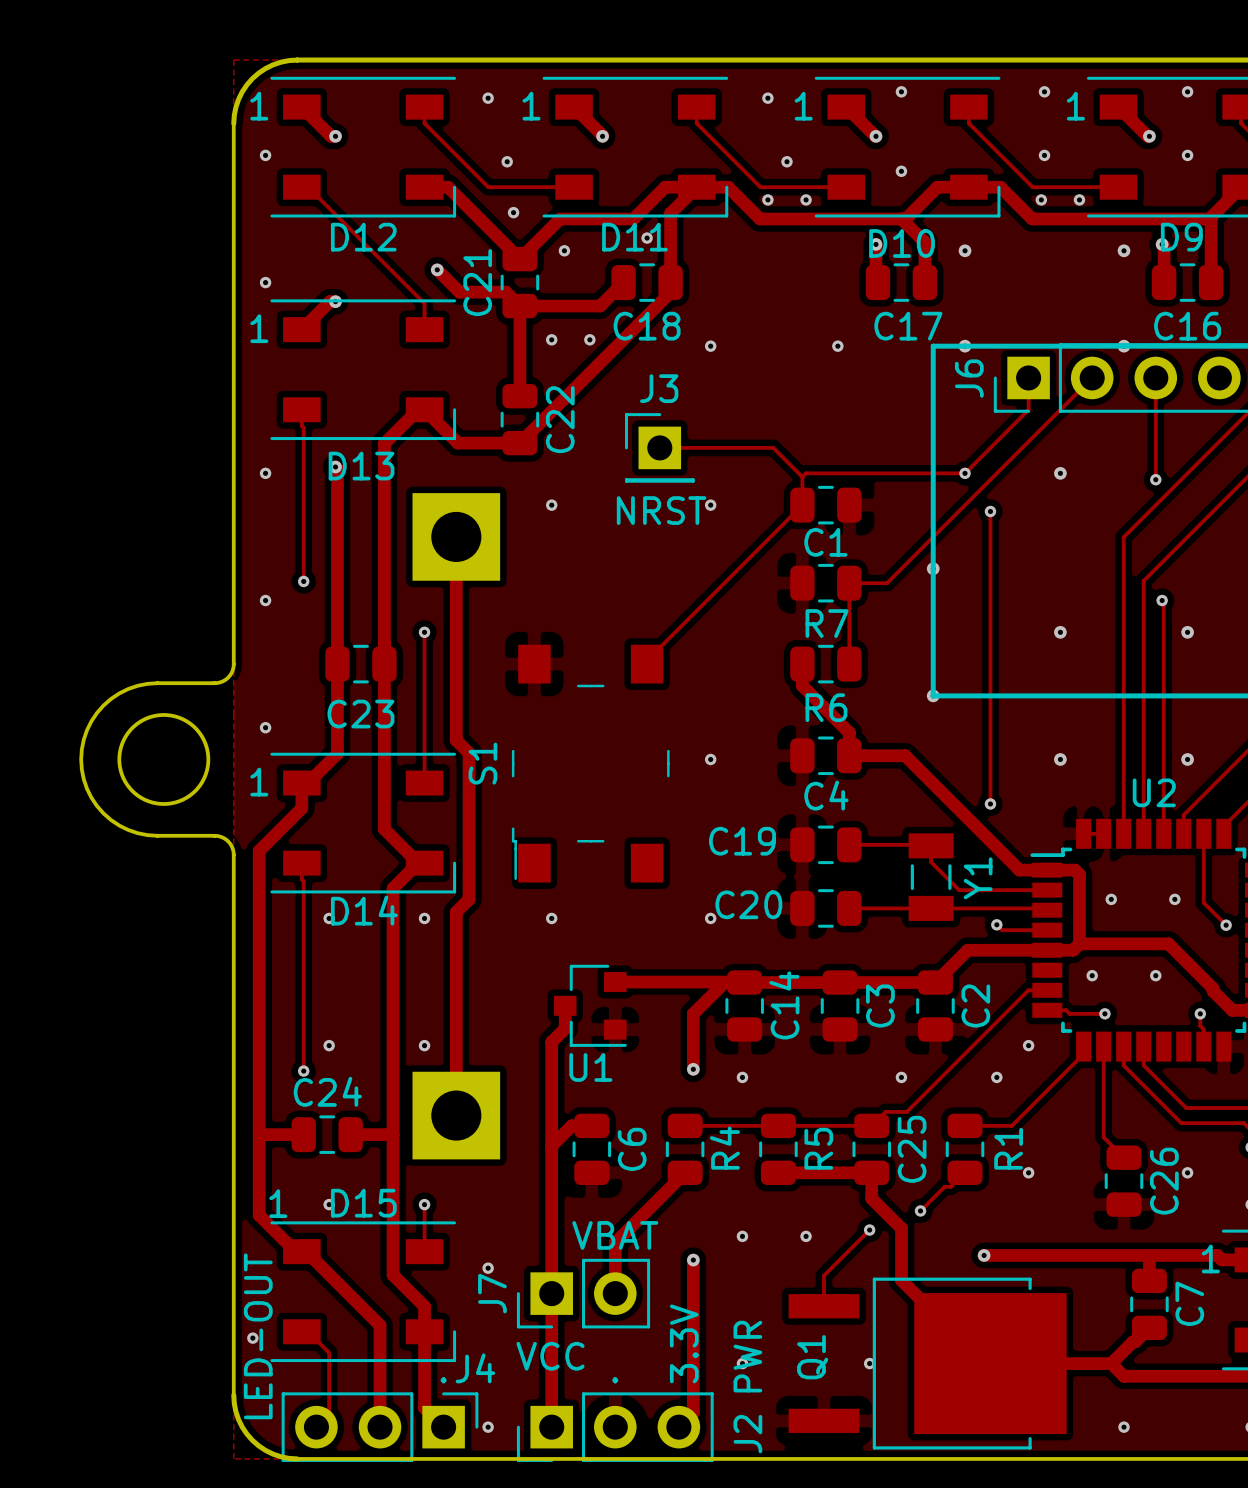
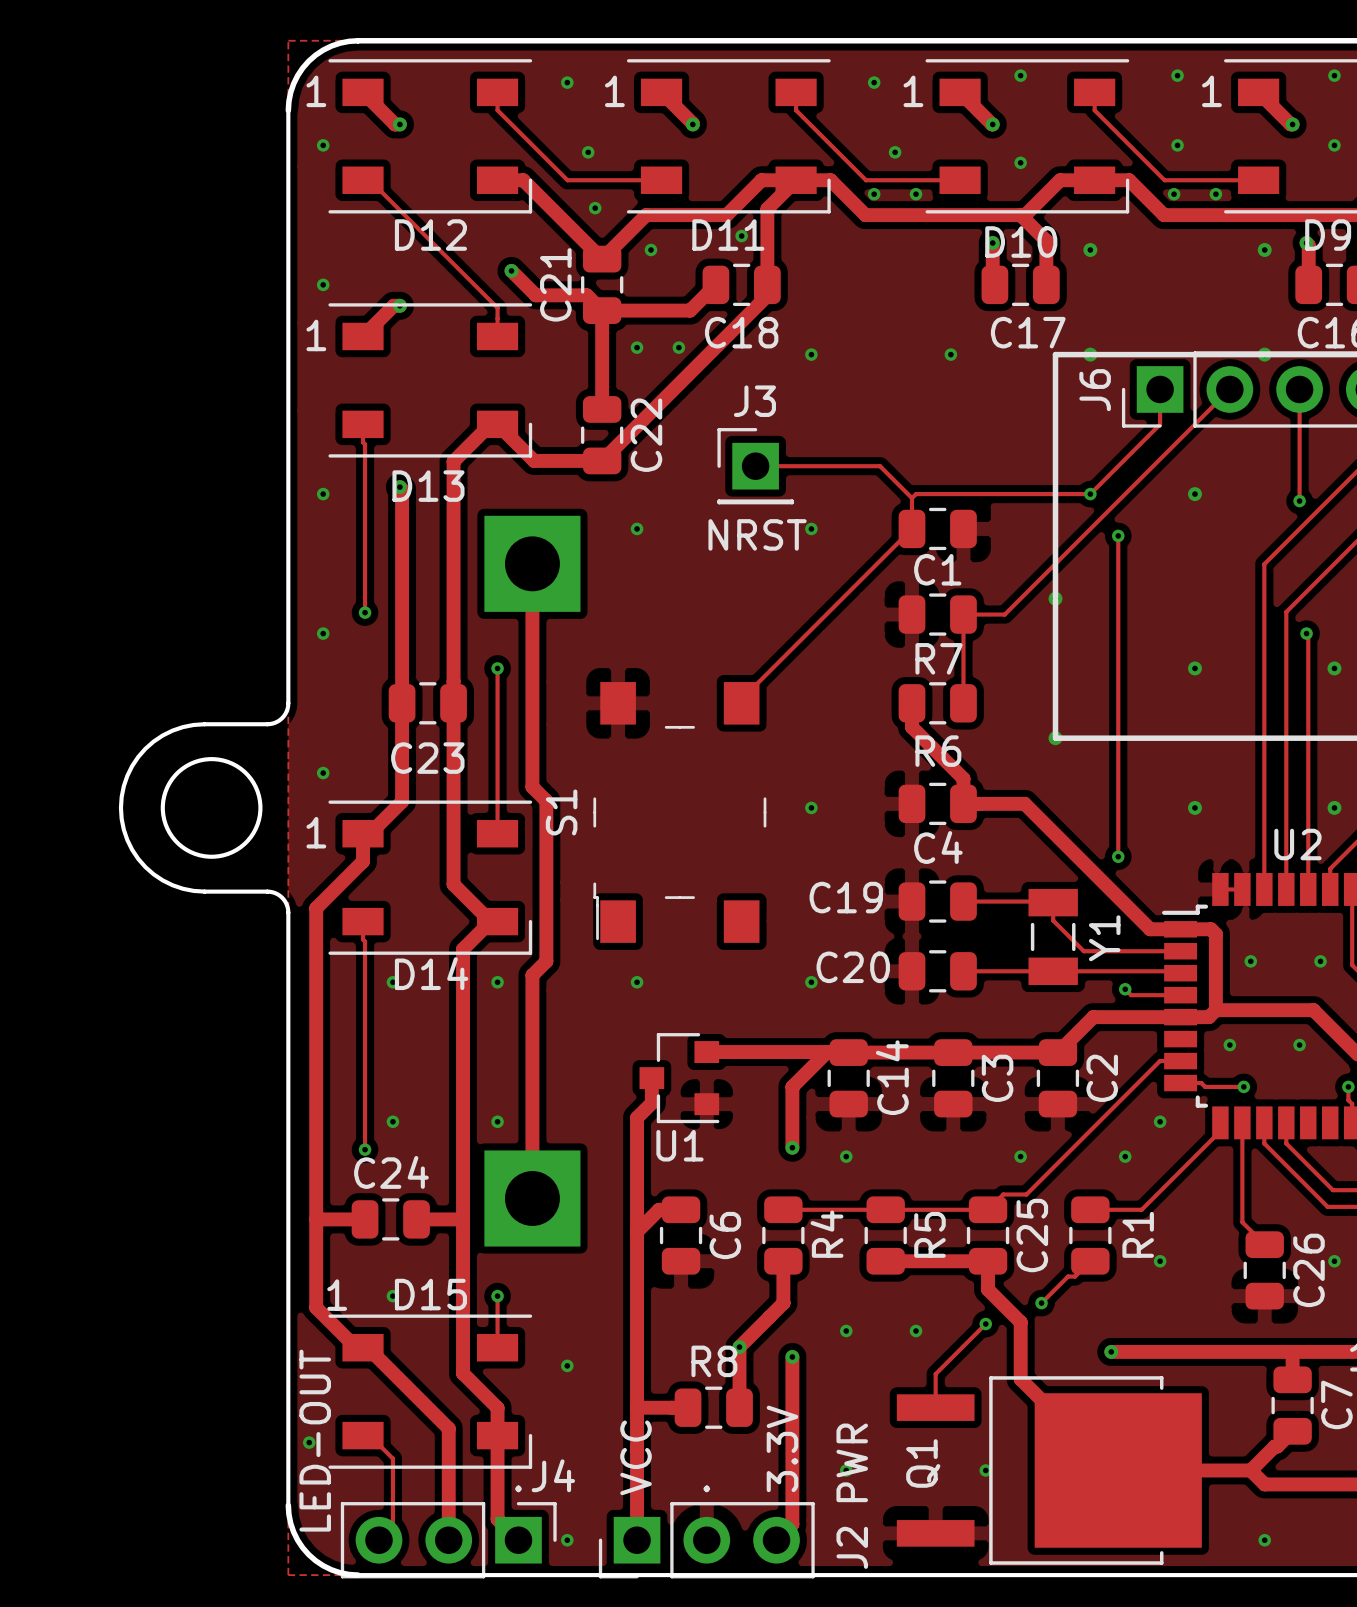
track: (685, 1172) (615, 1242) (615, 1293) -> (783, 1261) (783, 1302) (739, 1347) (739, 1407)
text: VBAT (615, 1235) -> none
via: none -> (739, 1347)
J7: (583, 1293) -> none
track: none -> (637, 1407) (688, 1407)
R8: none -> (713, 1407)
text rotation: 0° (550, 1356) -> 90° counterclockwise (636, 1457)

